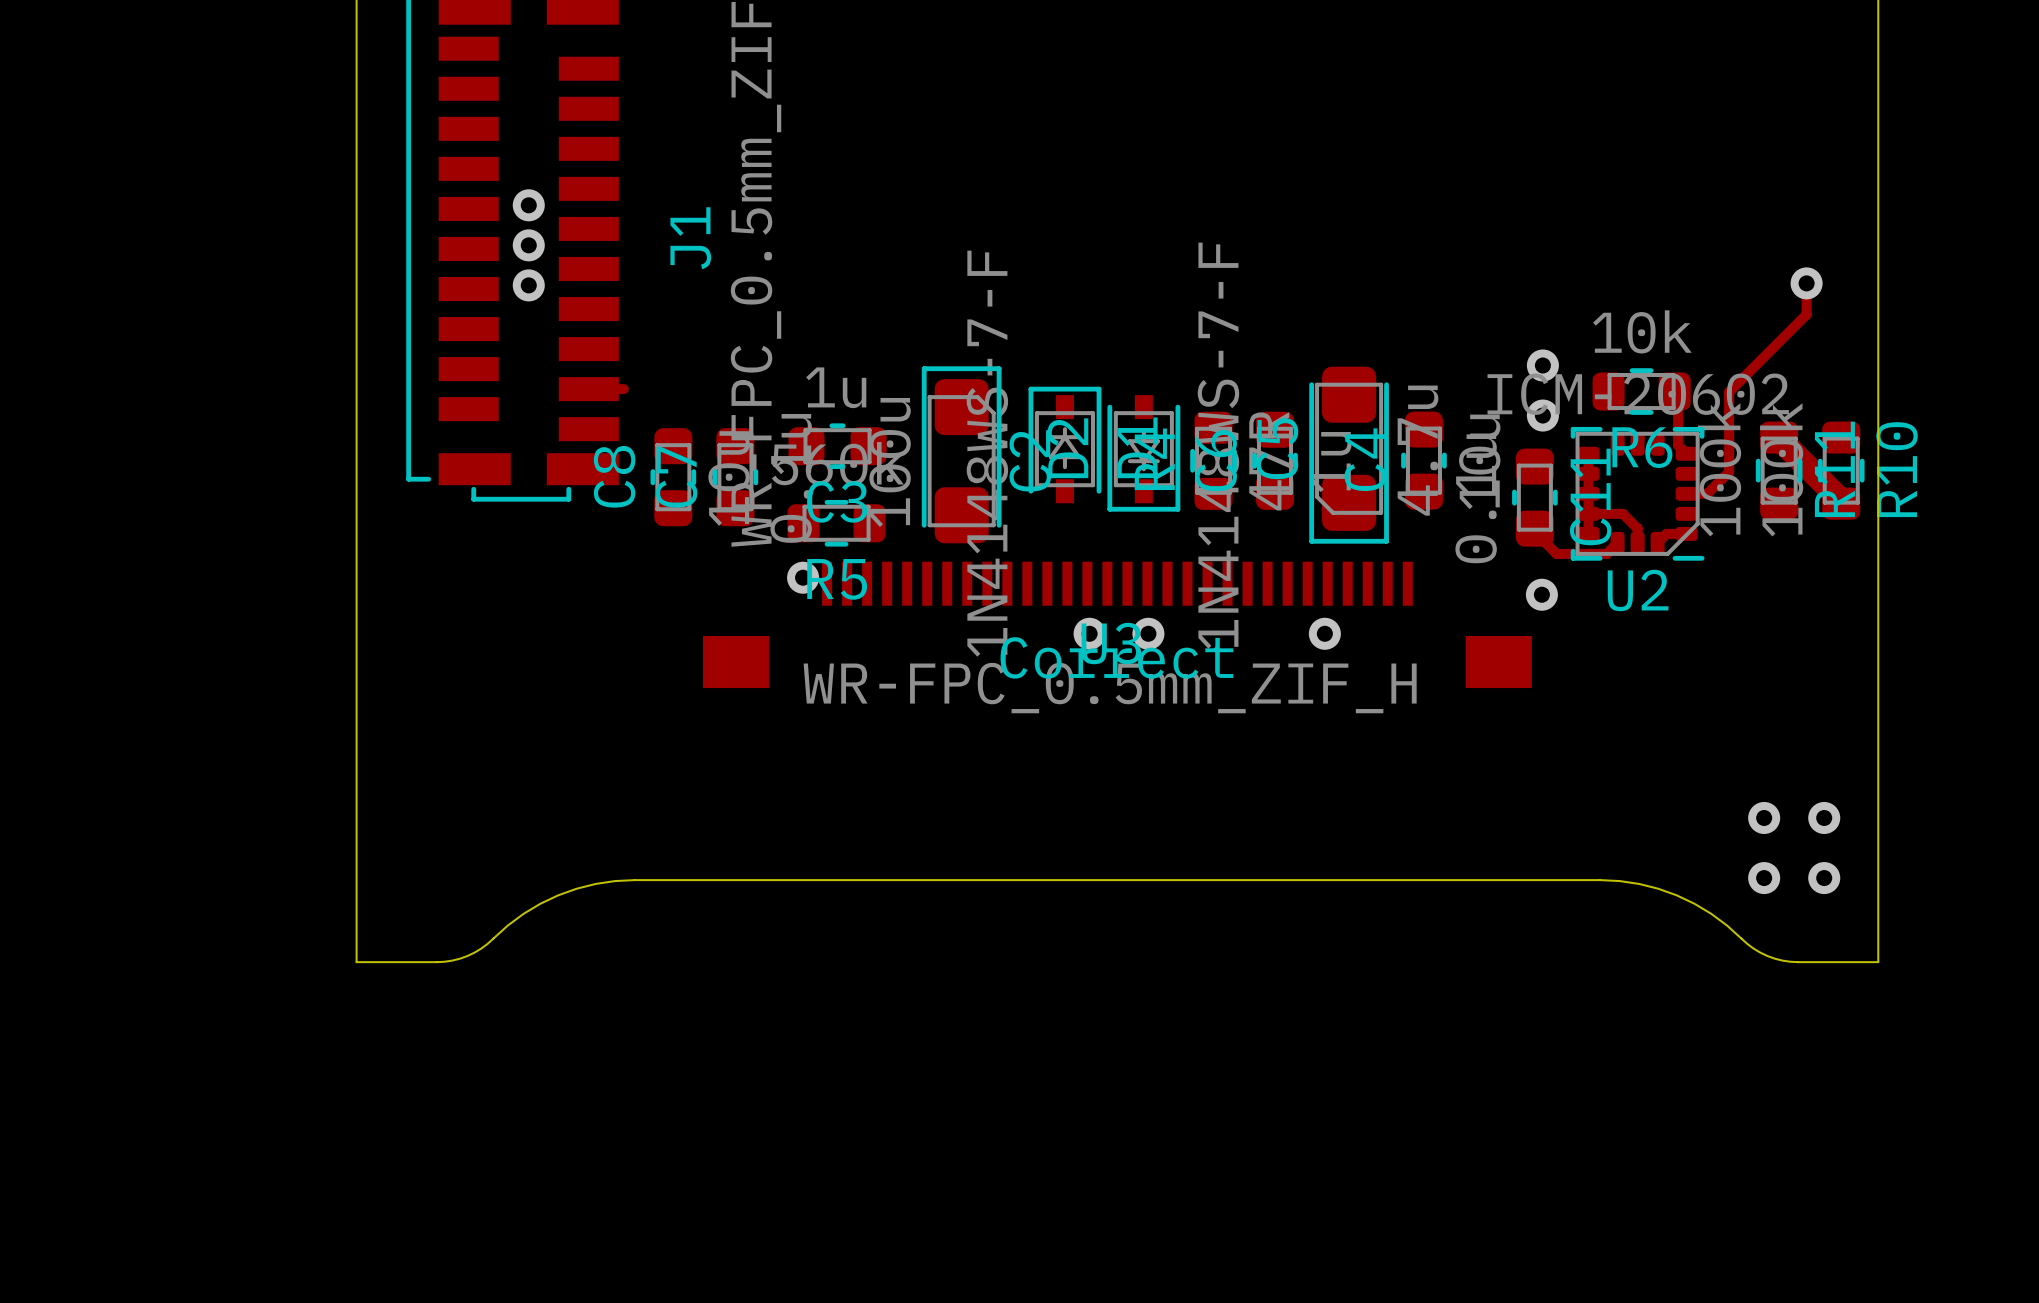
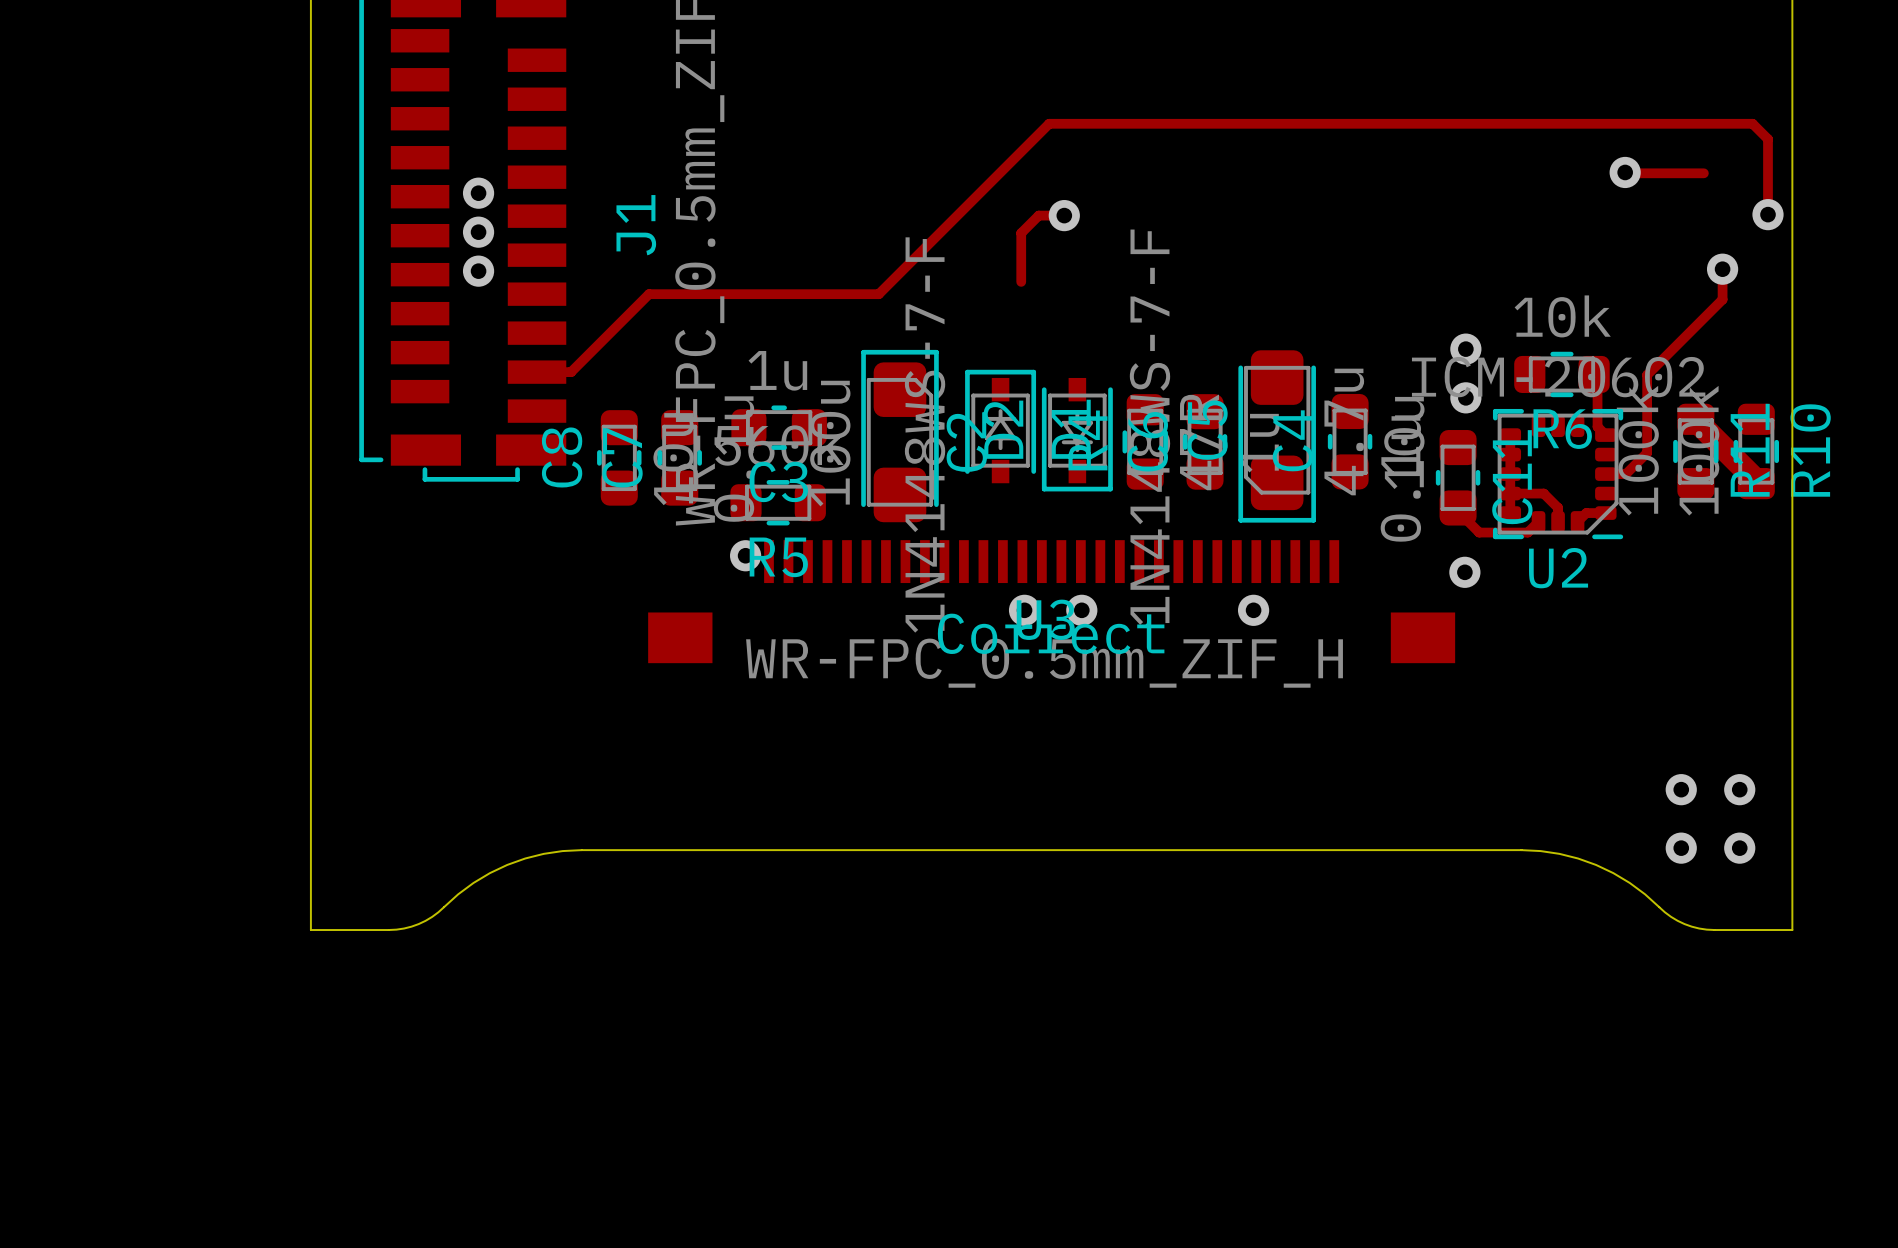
track: none -> (1625, 172) (1703, 173)
via: none -> (1625, 172)
track: none -> (1768, 214) (1768, 139) (1752, 123) (1049, 123) (878, 294) (649, 294) (571, 372)
via: none -> (1768, 214)
track: none -> (1064, 215) (1038, 215) (1021, 233) (1021, 281)
via: none -> (1064, 215)

